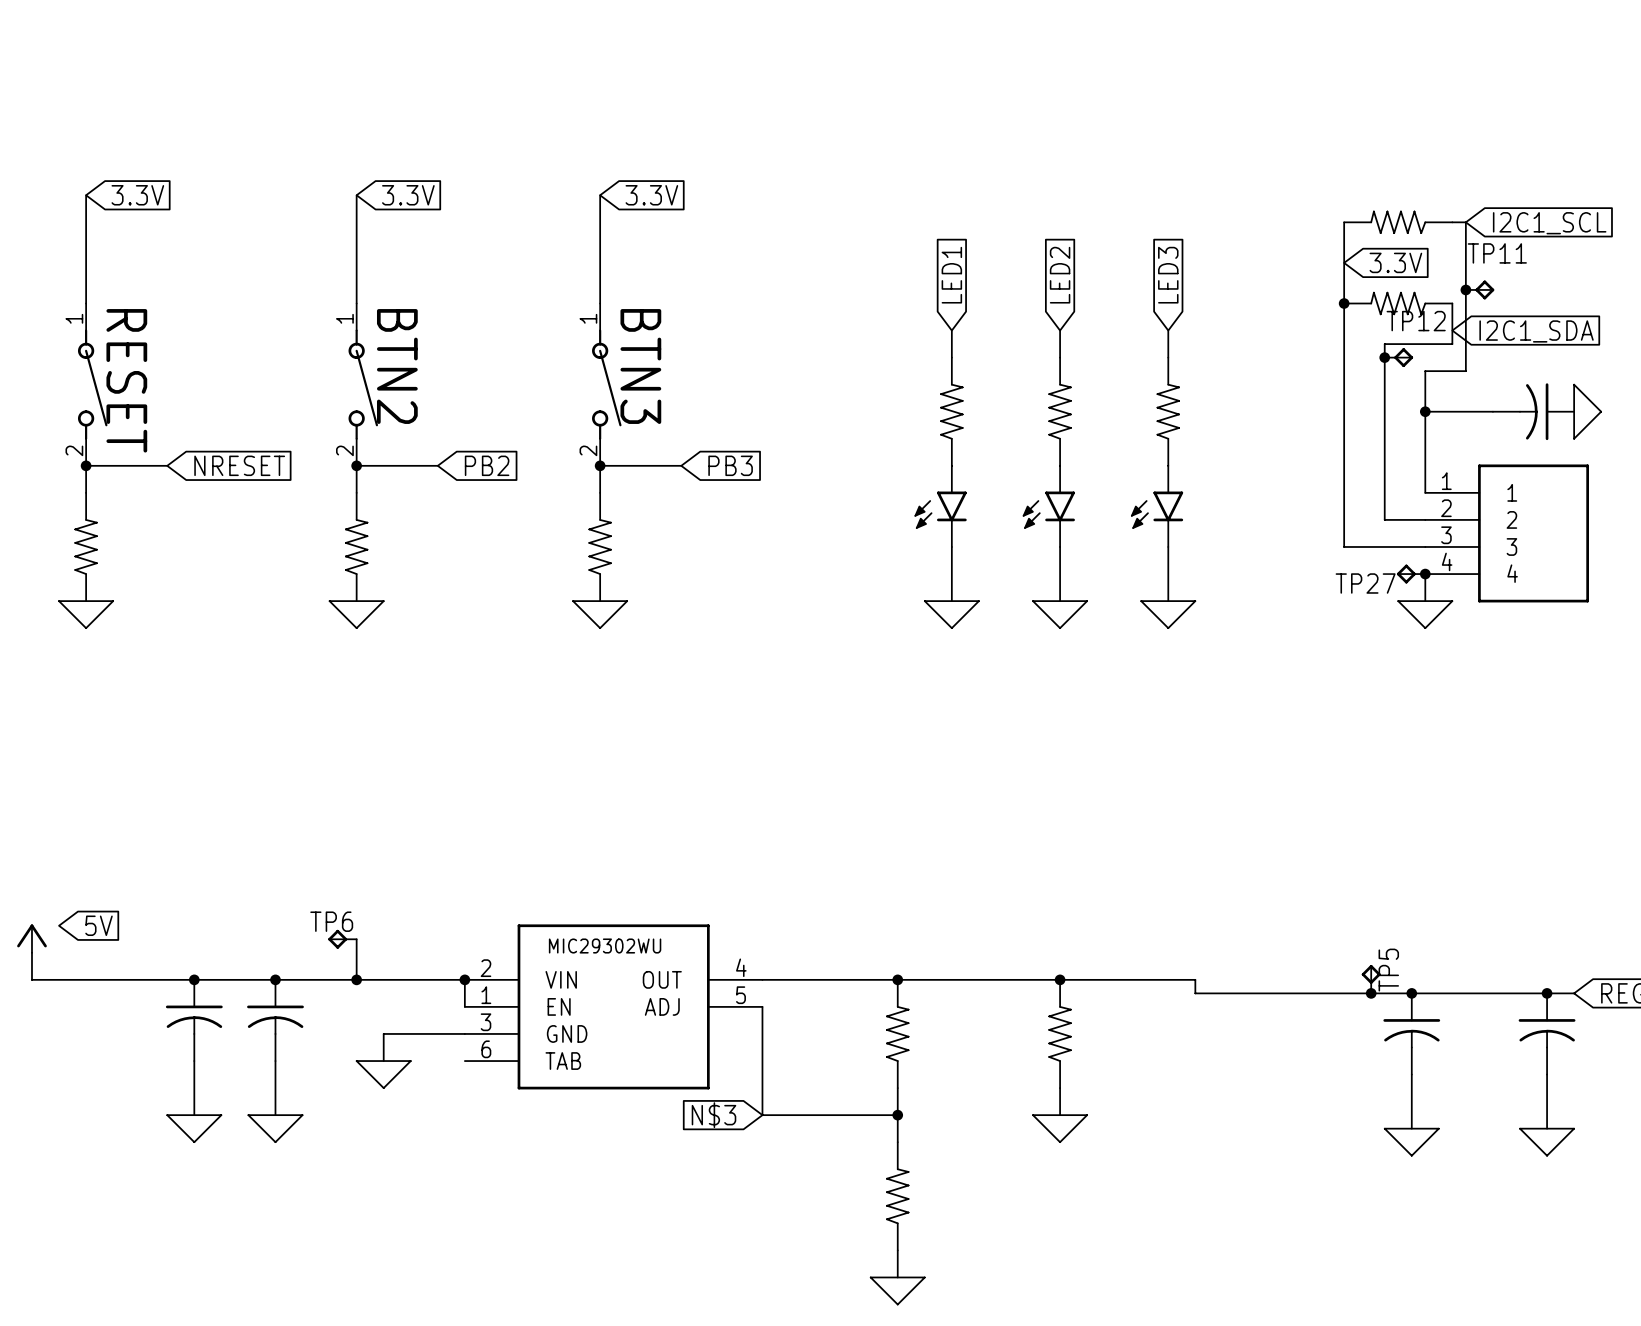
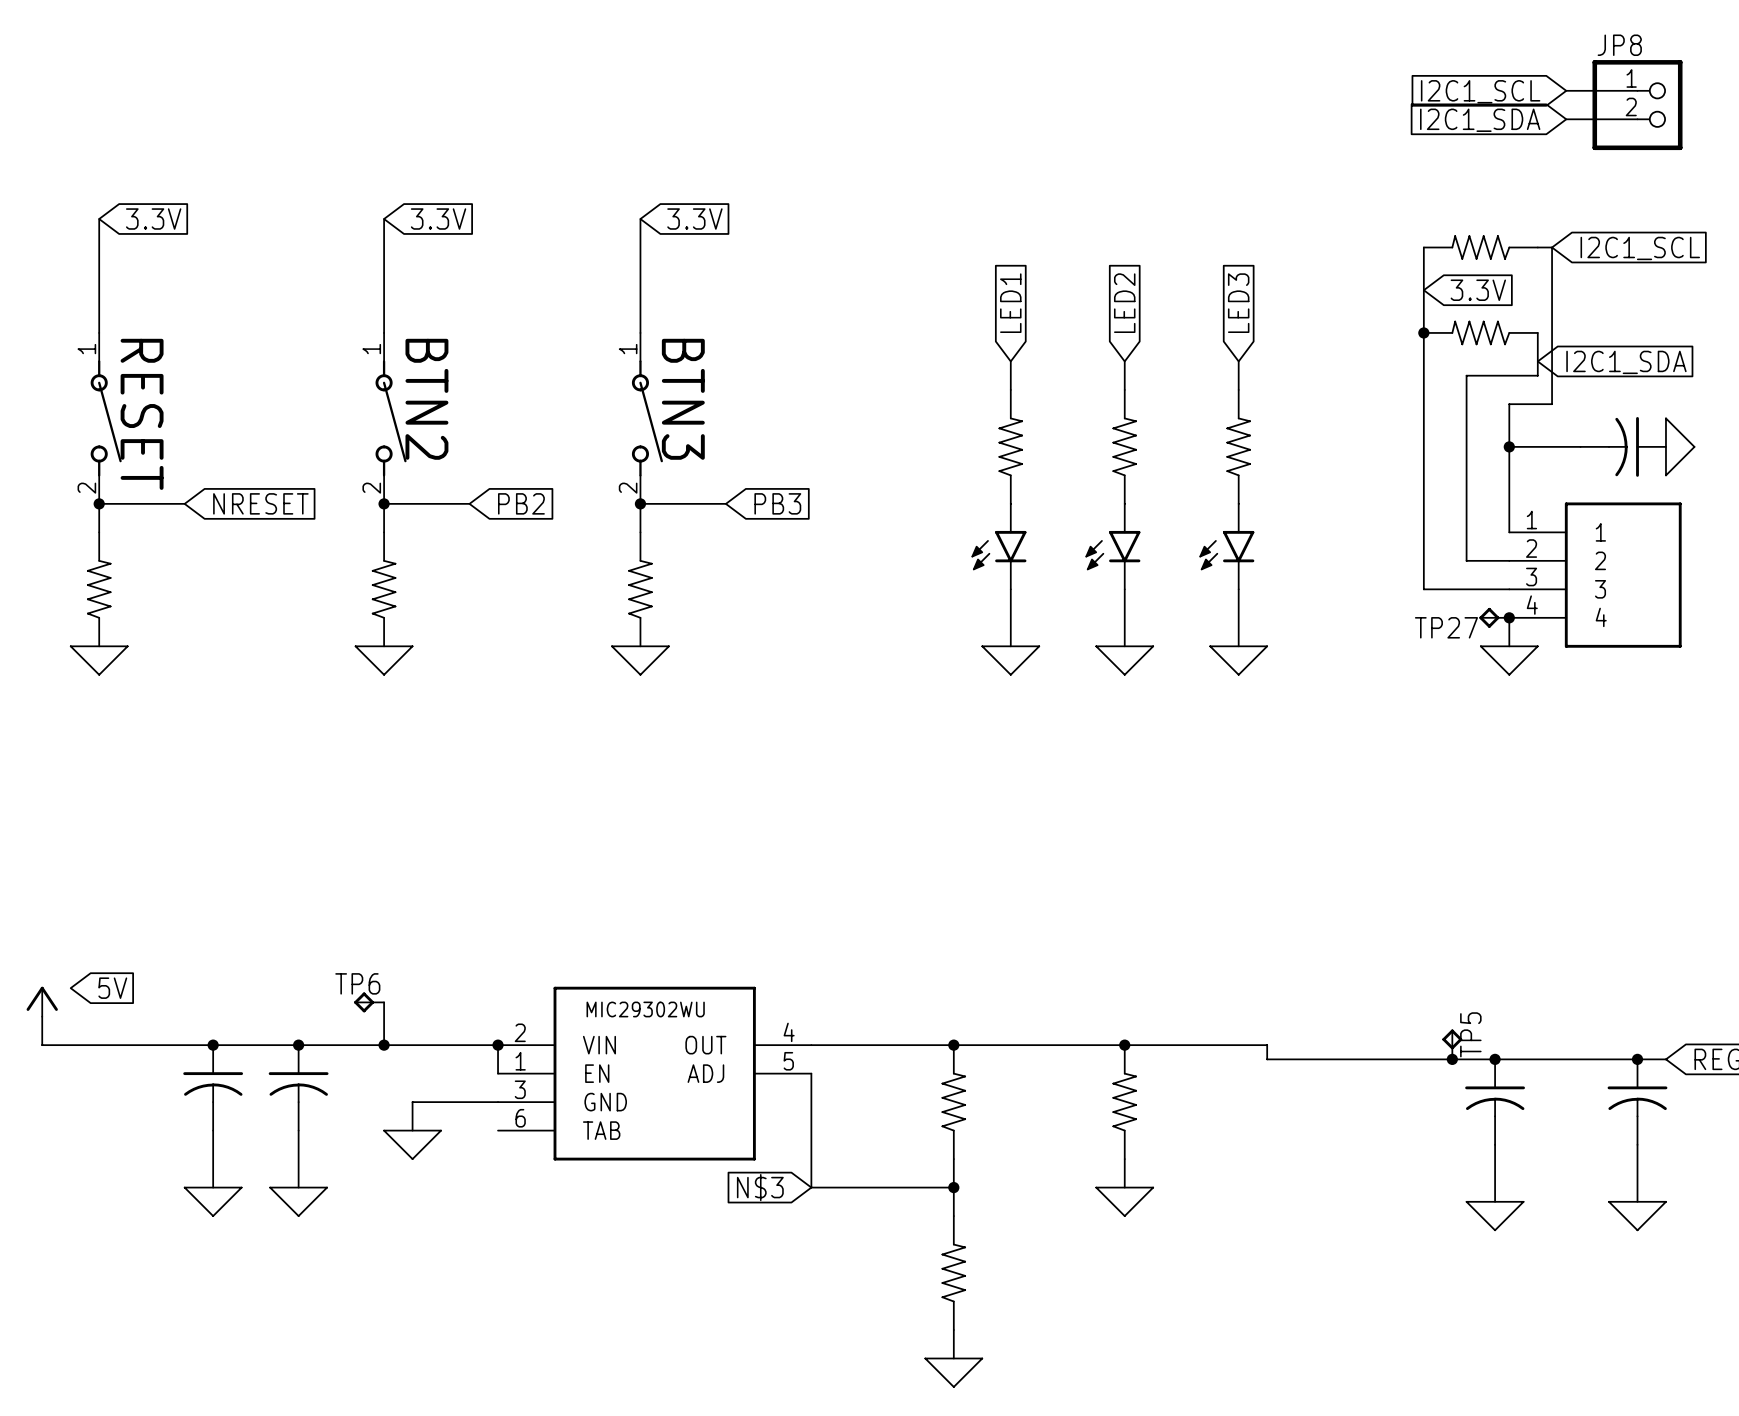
wire: none -> (1566, 90) (1637, 90)
global label: none -> I2C1_SCL (1480, 91)
JP8: none -> (1637, 105)
wire: none -> (1566, 119) (1637, 119)
global label: none -> I2C1_SDA (1480, 120)
junction: (1465, 289) -> none
TP11: (1480, 289) -> none
junction: (1384, 357) -> none
TP12: (1398, 357) -> none

